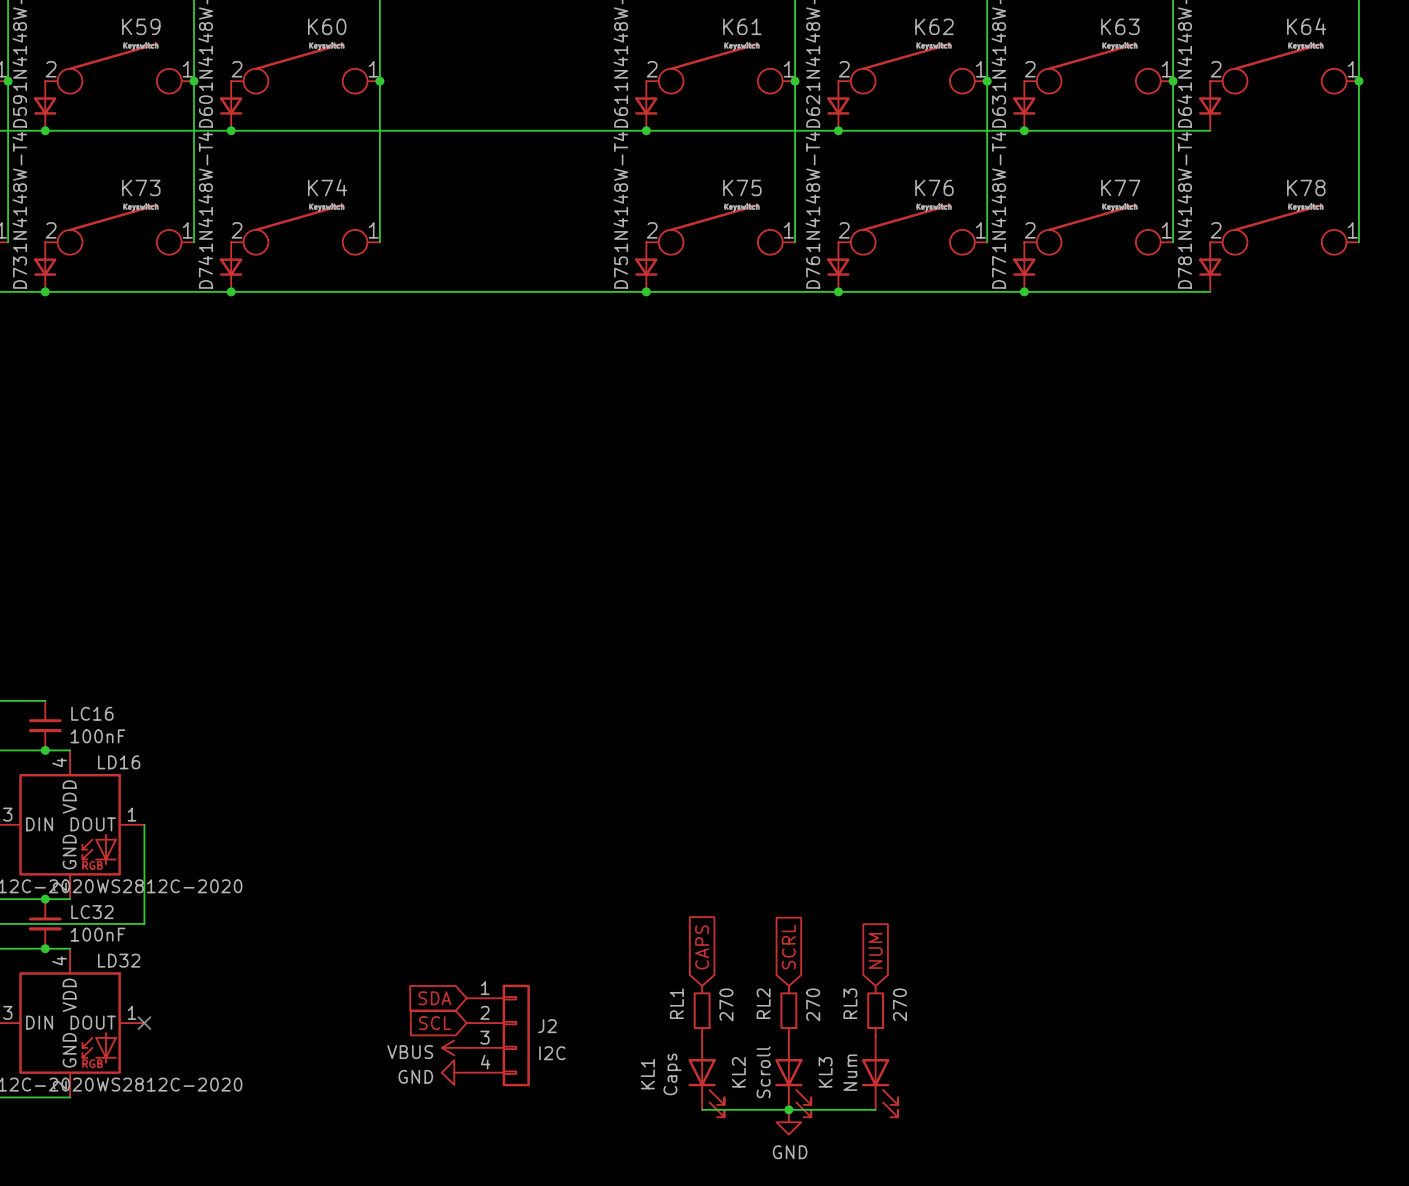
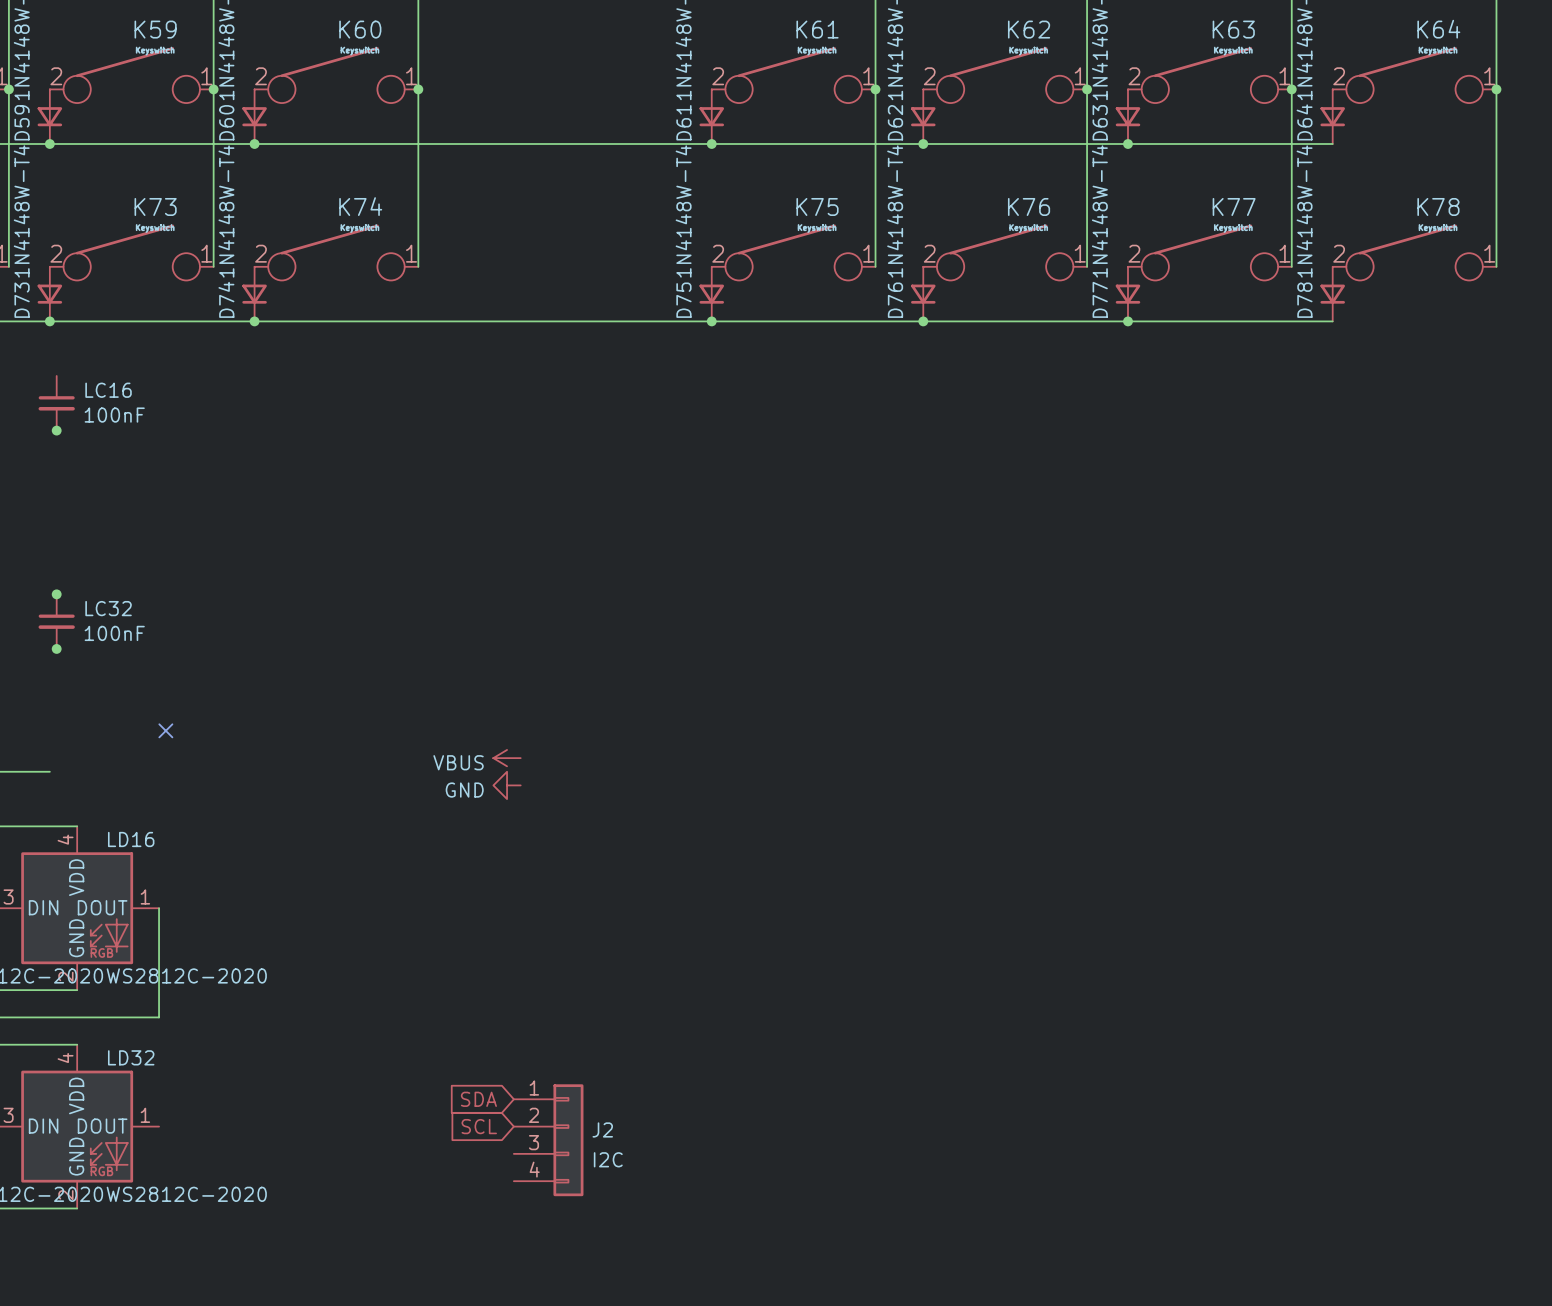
junction: none -> (56, 430)
junction: none -> (56, 594)
junction: none -> (56, 648)
no-connect mark: none -> (165, 730)
power symbol: none -> VBUS (507, 758)
power symbol: none -> GND (507, 785)
LC16 position: (45, 725) -> (56, 403)
junction: (45, 750) -> none
junction: (45, 899) -> none
LC32 position: (45, 923) -> (56, 621)
global label: CAPS (702, 947) -> none
global label: SCRL (788, 947) -> none
junction: (45, 948) -> none
global label: NUM (875, 950) -> none
RL1: 270 (702, 1010) -> none
RL2: 270 (788, 1010) -> none
RL3: 270 (875, 1010) -> none
no-connect mark: (144, 1023) -> none
power symbol: VBUS (454, 1047) -> none
power symbol: GND (454, 1072) -> none
KL1: Caps (706, 1076) -> none
KL2: Scroll (793, 1076) -> none
KL3: Num (879, 1076) -> none
wire: (702, 1109) (875, 1109) -> none
junction: (788, 1109) -> none
power symbol: GND (788, 1122) -> none

